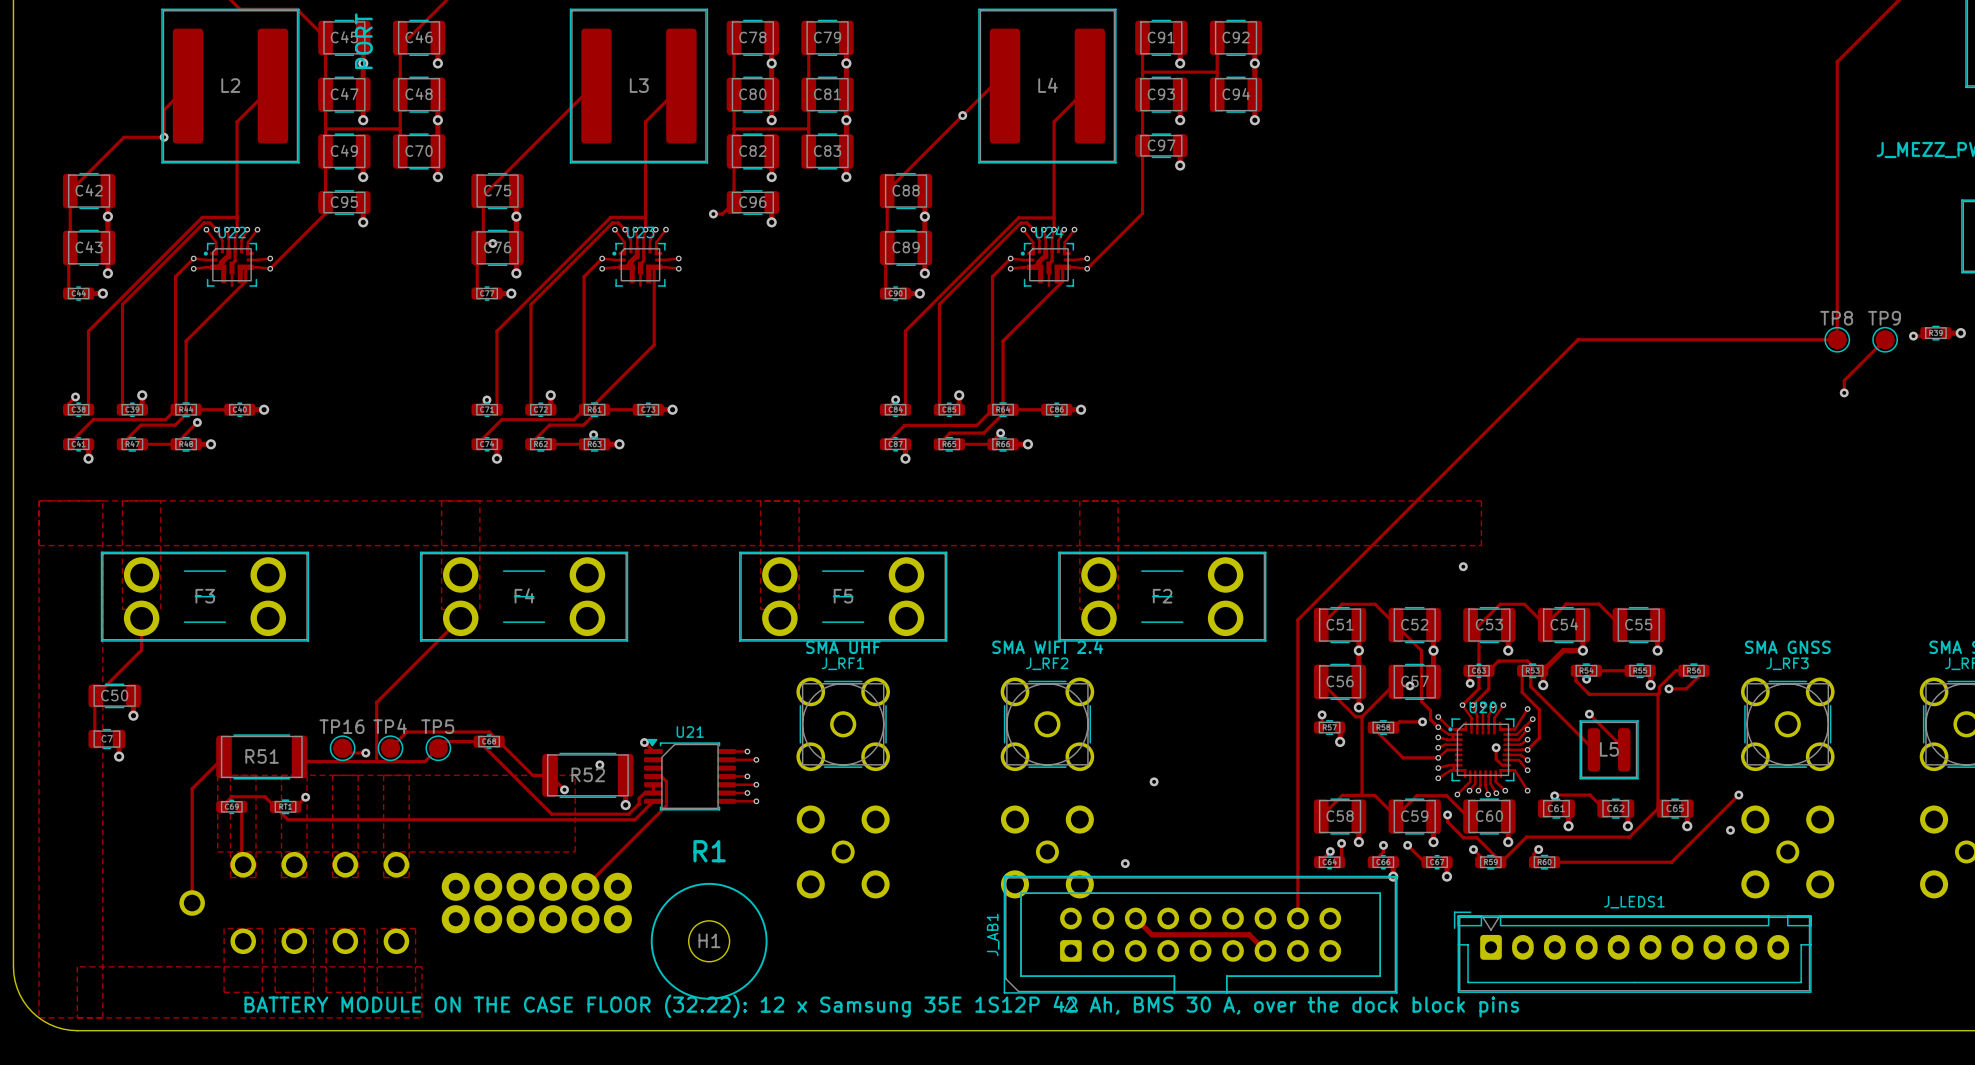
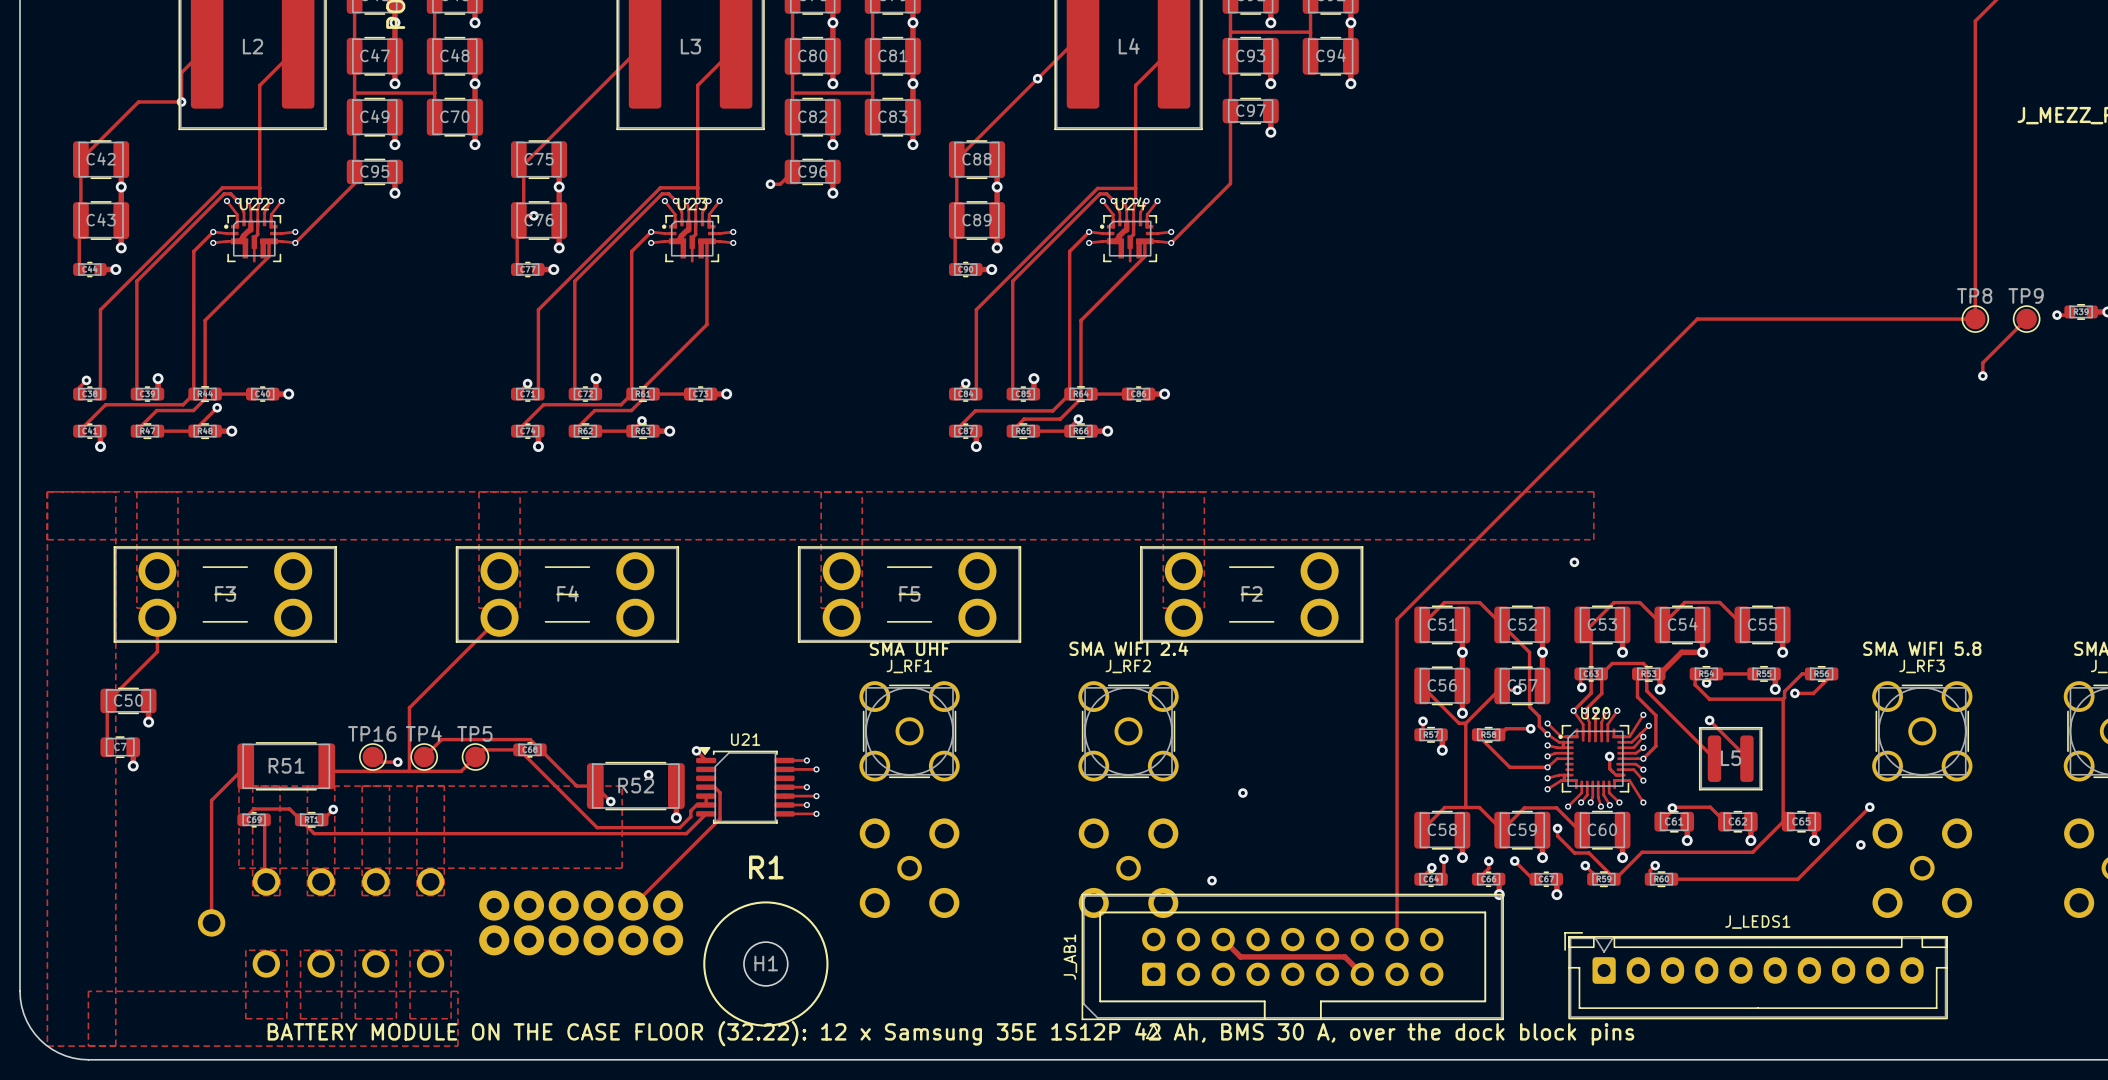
text: SMA GNSS (1787, 647) -> SMA WIFI 5.8 (1922, 648)

